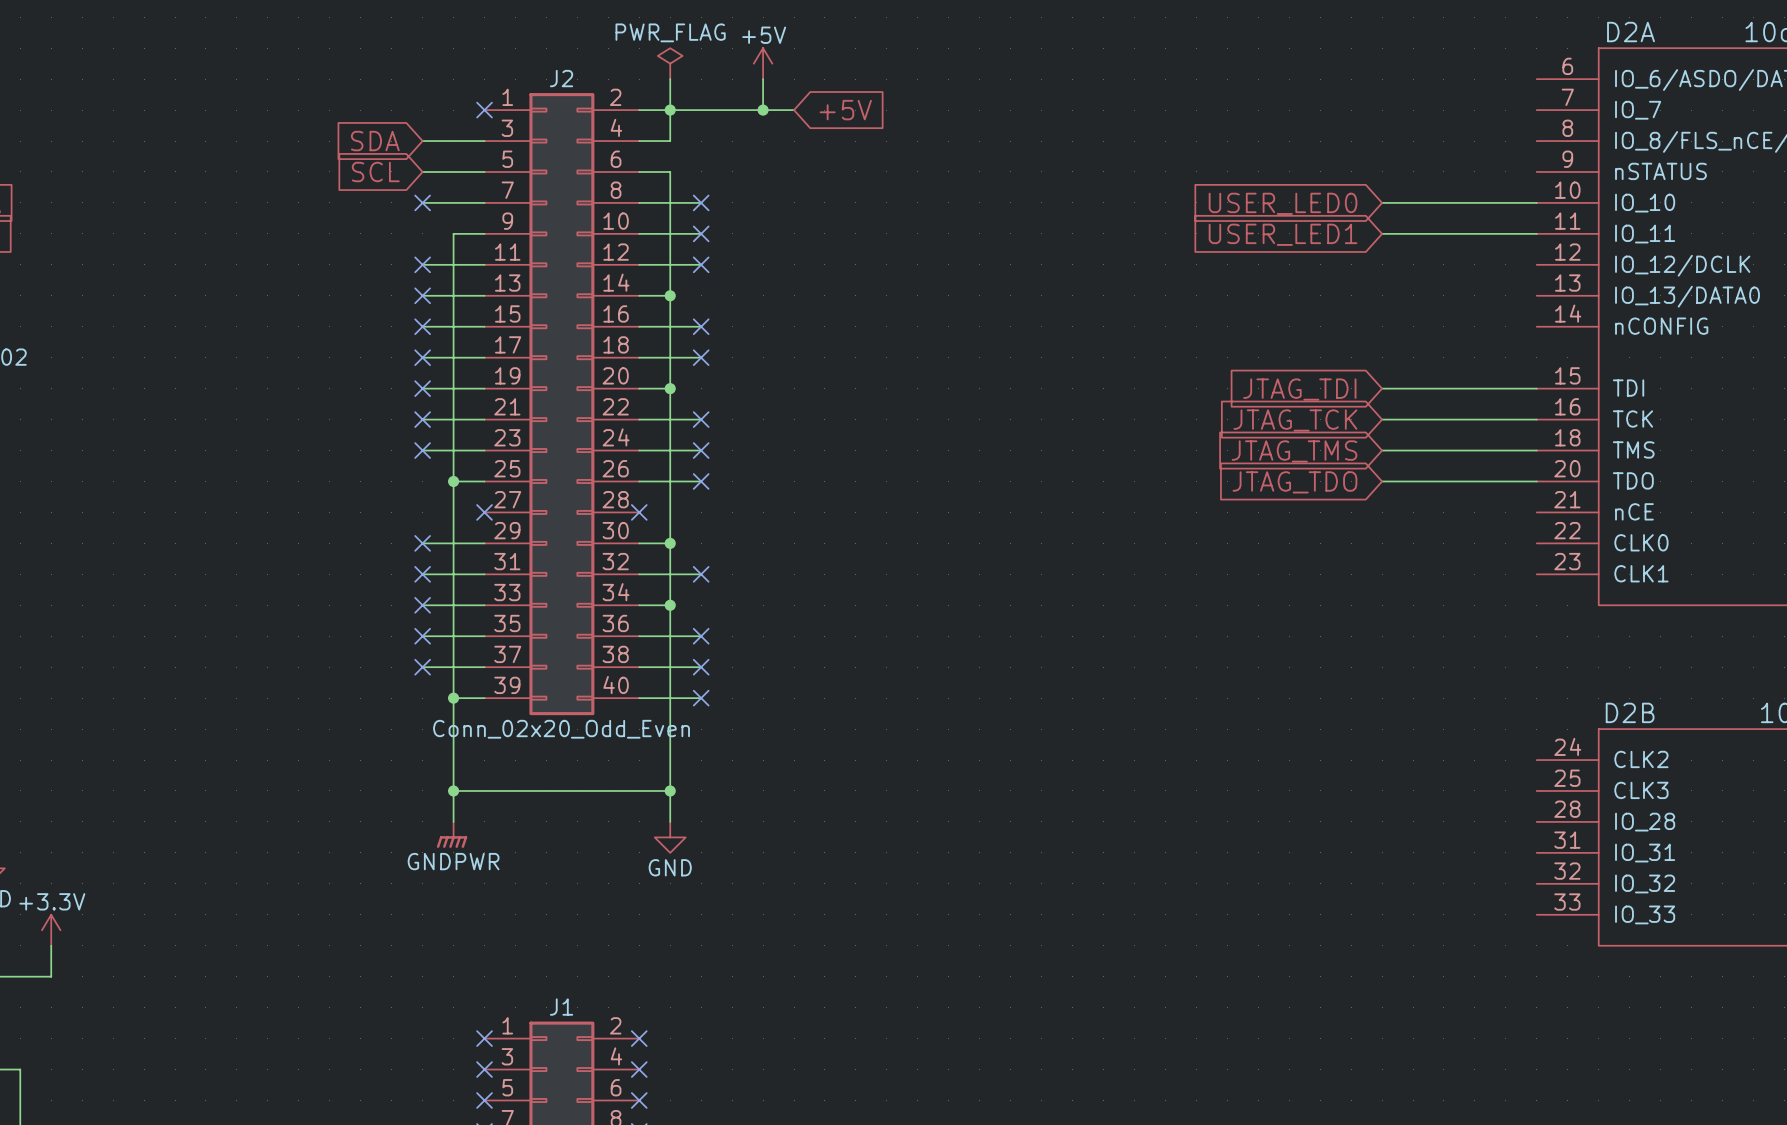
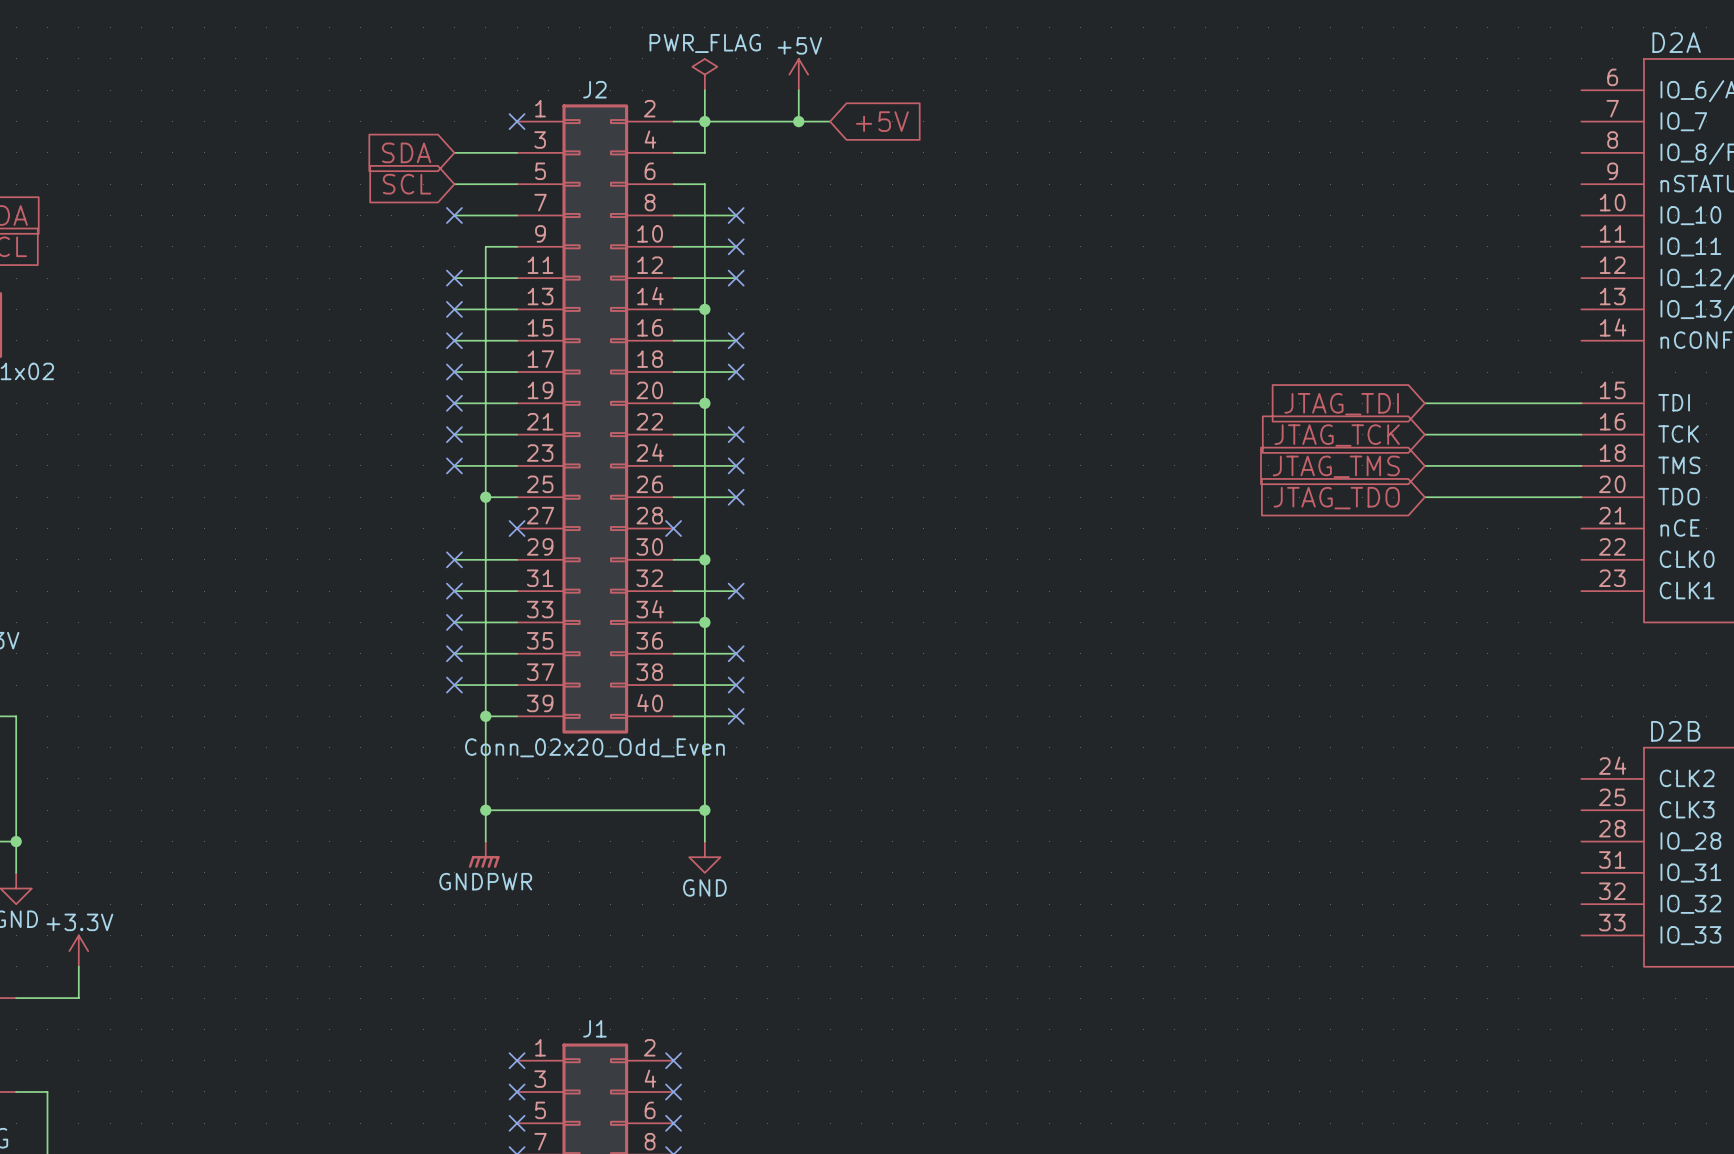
wire: (1382, 202) (1536, 202) -> none
global label: USER_LED0 (1283, 203) -> none
wire: (1382, 233) (1536, 233) -> none
global label: USER_LED1 (1283, 234) -> none

